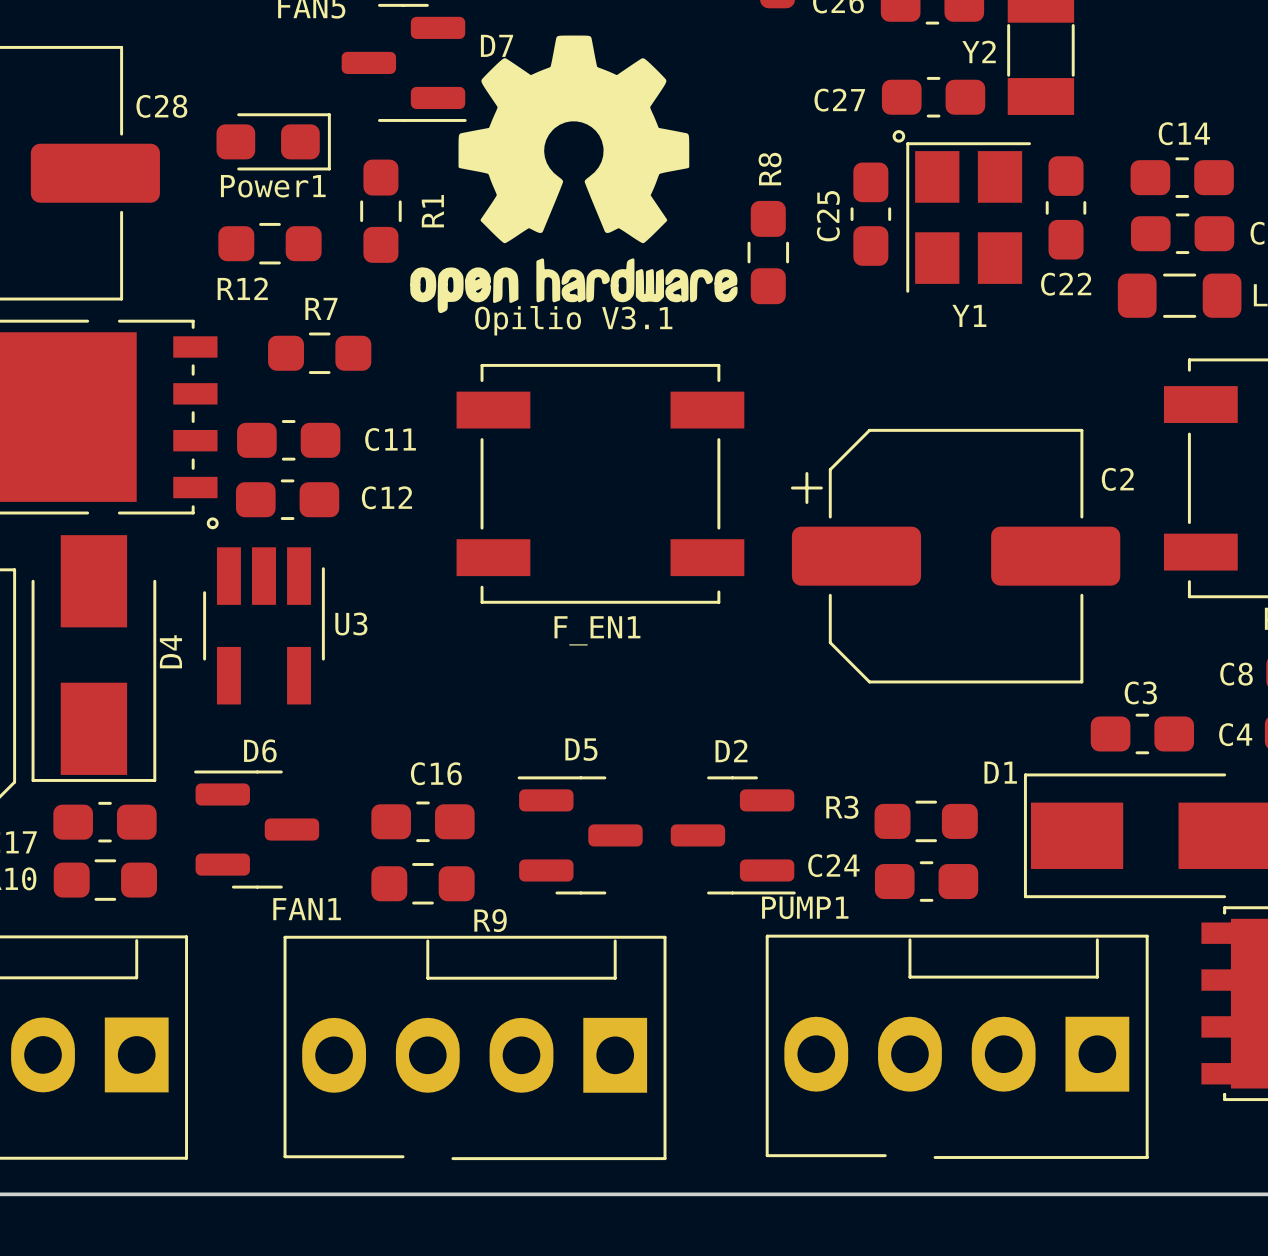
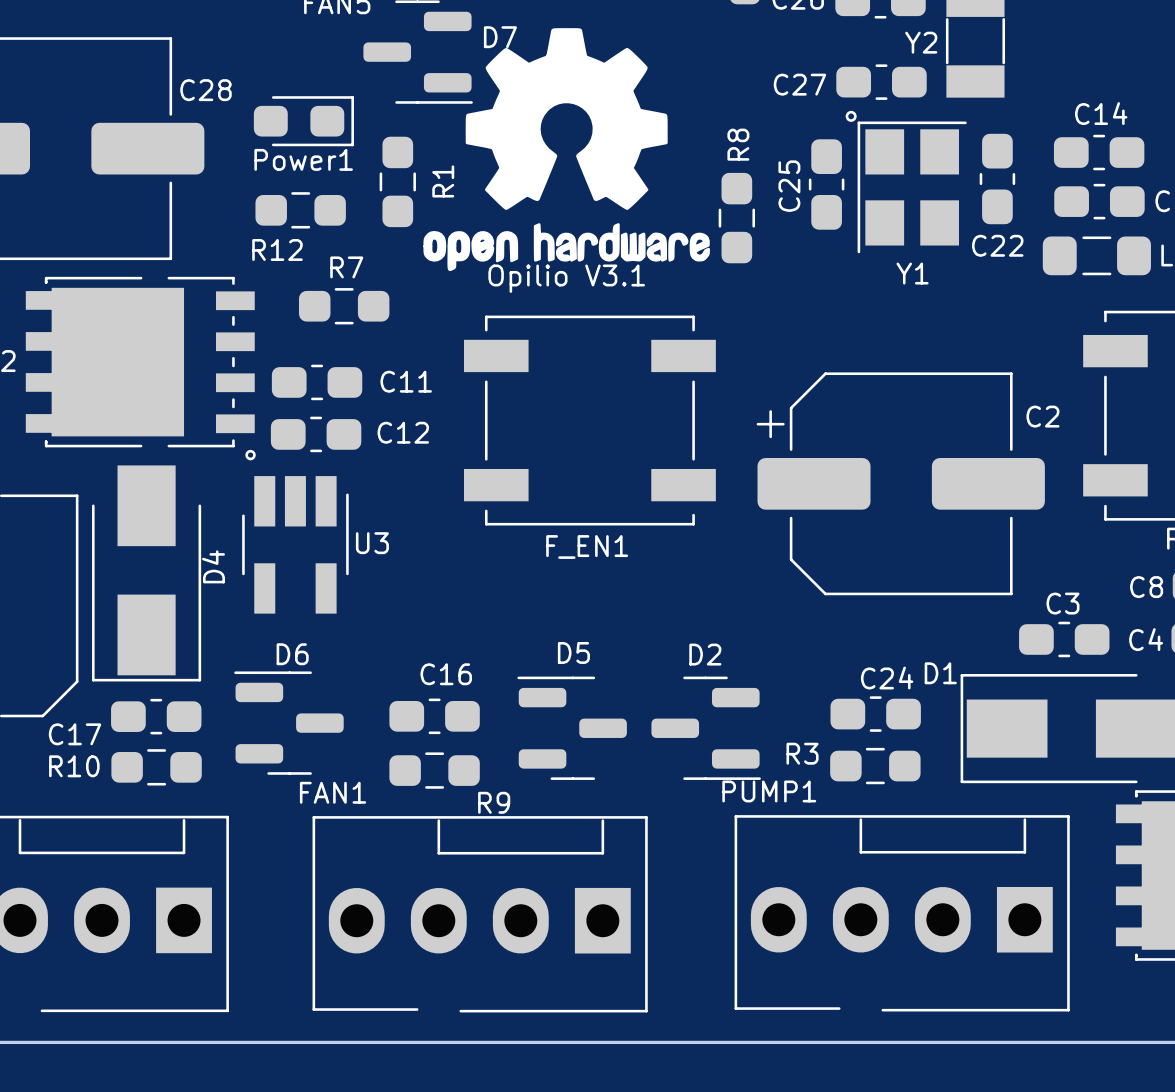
R3 position: (926, 821) -> (875, 766)
C24 name position: C24 (833, 865) -> C24 (887, 678)
C24 position: (926, 881) -> (875, 714)

